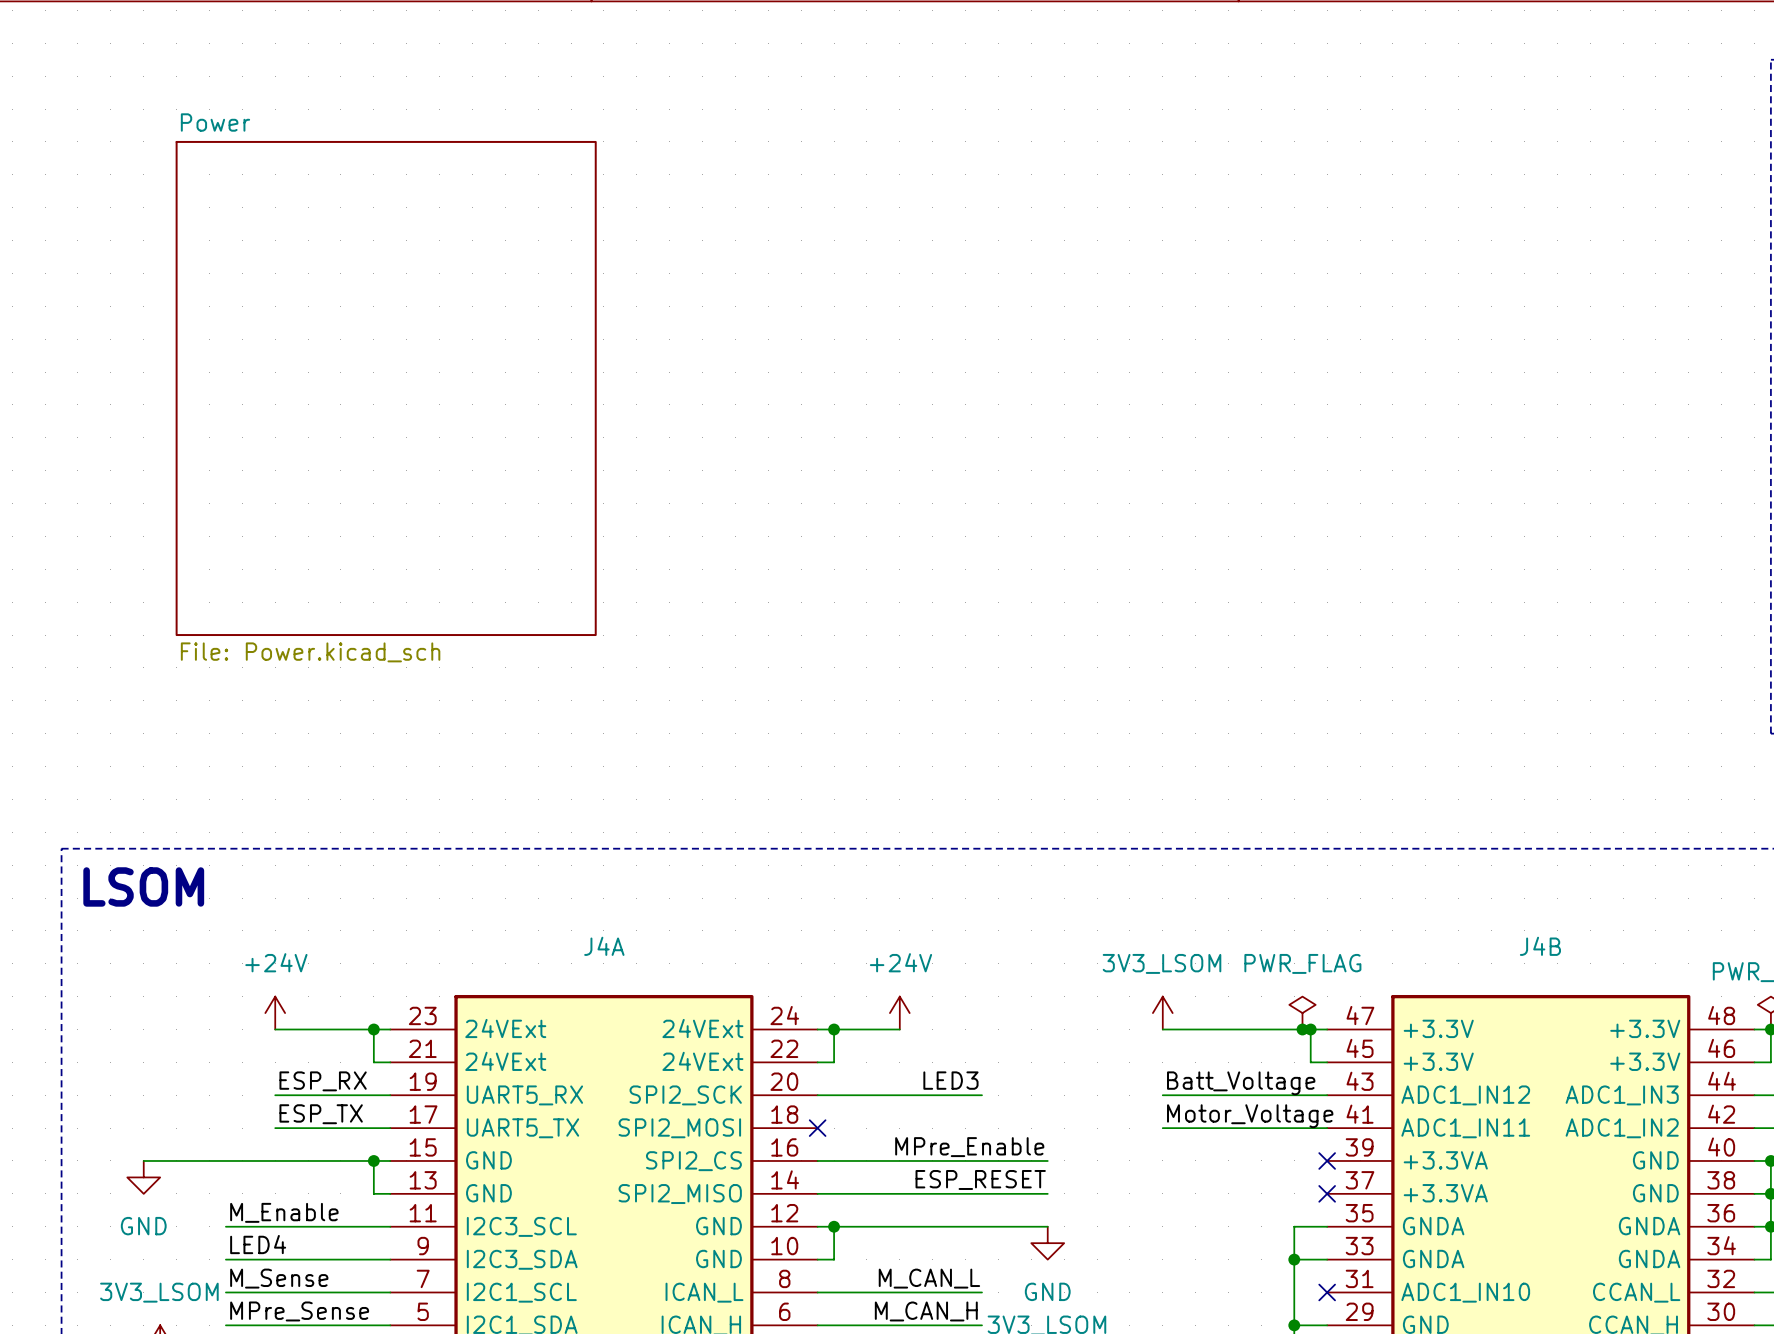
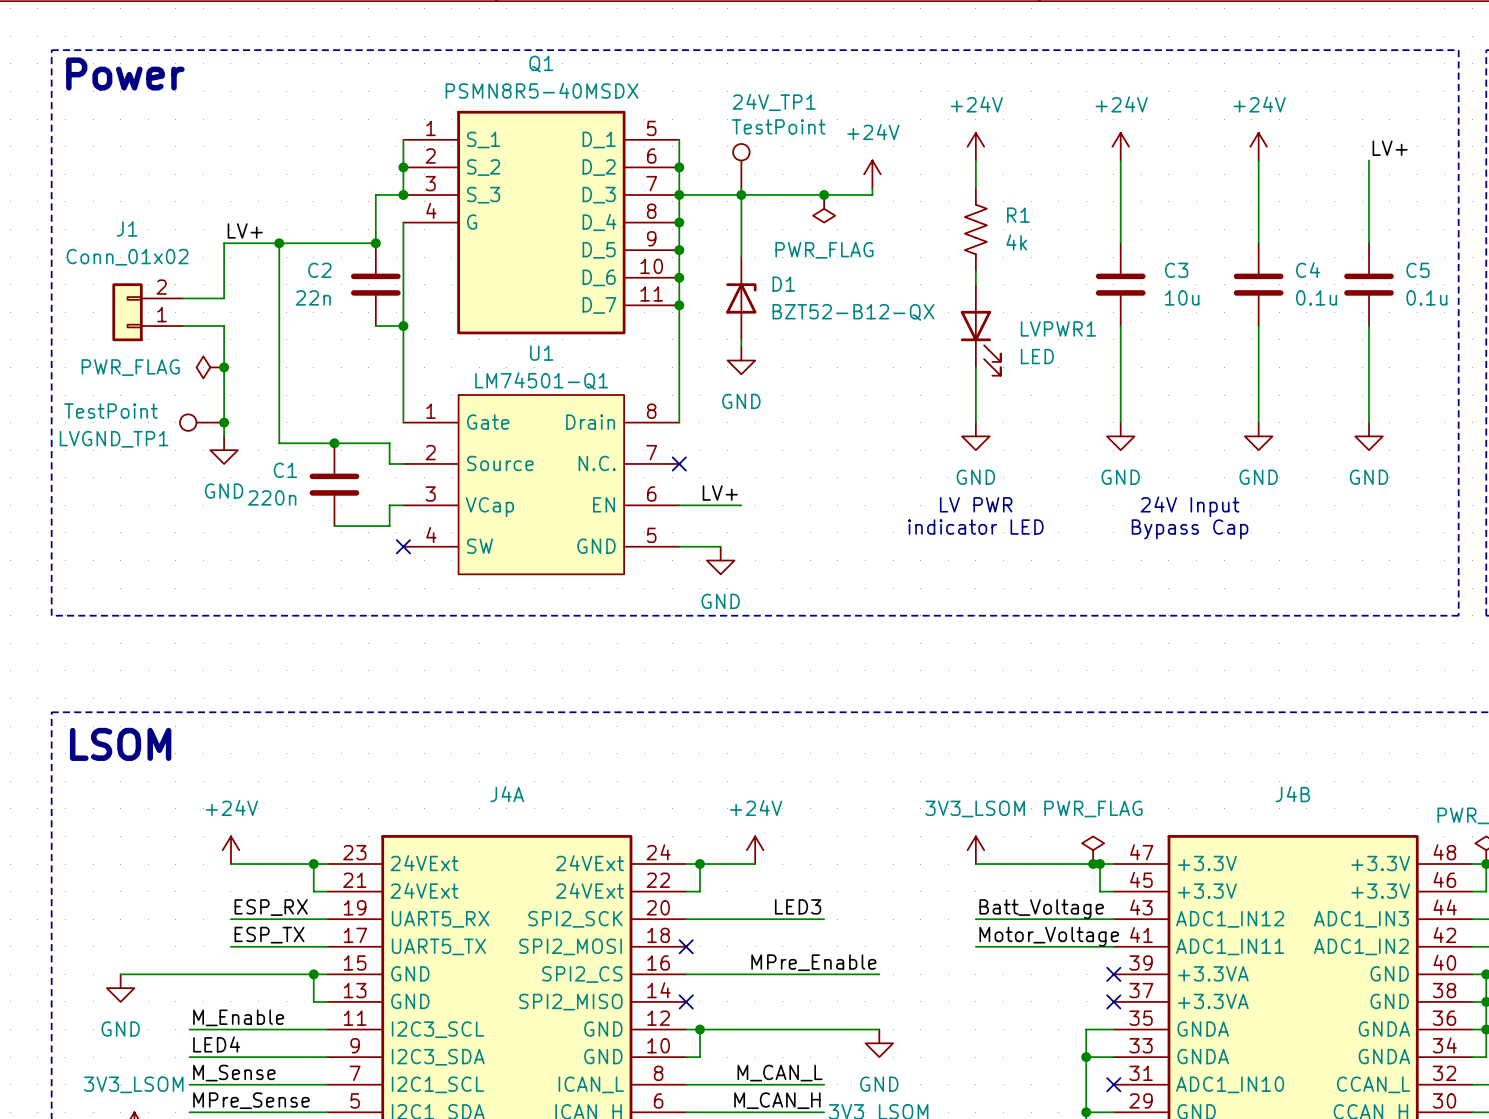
line: none -> (51, 50) (51, 615) (1458, 615) (1458, 50) (51, 50)
text: none -> Power (125, 73)
wire: none -> (403, 139) (403, 194) (375, 194) (375, 243) (224, 243) (224, 298) (182, 298)
wire: none -> (679, 139) (679, 422)
power symbol: none -> +24V (975, 146)
power symbol: none -> +24V (1120, 146)
power symbol: none -> +24V (1258, 146)
label: none -> LV+ (1390, 148)
wire: none -> (975, 160) (975, 188)
wire: none -> (1120, 160) (1120, 243)
wire: none -> (1258, 160) (1258, 243)
wire: none -> (1369, 160) (1369, 243)
24V_TP1: none -> TestPoint (741, 166)
junction: none -> (403, 167)
junction: none -> (679, 167)
power symbol: none -> +24V (872, 174)
wire: none -> (741, 188) (741, 257)
wire: none -> (872, 188) (872, 194) (679, 194)
junction: none -> (403, 194)
junction: none -> (679, 194)
junction: none -> (741, 194)
junction: none -> (824, 194)
power symbol: none -> PWR_FLAG (824, 208)
wire: none -> (403, 222) (403, 422)
Q1: none -> PSMN8R5-40MSDX (541, 222)
junction: none -> (679, 222)
R1: none -> 4k (975, 229)
label: none -> LV+ (245, 230)
wire: none -> (279, 243) (279, 443) (389, 443) (389, 463) (403, 463)
junction: none -> (279, 243)
junction: none -> (375, 243)
junction: none -> (679, 250)
wire: none -> (975, 270) (975, 284)
junction: none -> (679, 277)
C2: none -> 22n (375, 284)
C3: none -> 10u (1120, 284)
C4: none -> 0.1u (1258, 284)
C5: none -> 0.1u (1369, 284)
D1: none -> BZT52-B12-QX (741, 298)
junction: none -> (679, 305)
J1: none -> Conn_01x02 (147, 312)
wire: none -> (182, 326) (224, 326) (224, 436)
sheet Power: File: Power.kicad_sch (386, 388) -> none
wire: none -> (375, 326) (403, 326)
junction: none -> (403, 326)
wire: none -> (1120, 326) (1120, 422)
wire: none -> (1258, 326) (1258, 422)
wire: none -> (1369, 326) (1369, 422)
LVPWR1: none -> LED (980, 330)
wire: none -> (741, 339) (741, 346)
power symbol: none -> GND (741, 360)
power symbol: none -> PWR_FLAG (210, 367)
junction: none -> (224, 367)
wire: none -> (975, 367) (975, 422)
LVGND_TP1: none -> TestPoint (202, 422)
junction: none -> (224, 422)
power symbol: none -> GND (975, 436)
power symbol: none -> GND (1120, 436)
power symbol: none -> GND (1258, 436)
power symbol: none -> GND (1369, 436)
junction: none -> (334, 443)
power symbol: none -> GND (224, 450)
no-connect mark: none -> (679, 463)
C1: none -> 220n (334, 484)
U1: none -> LM74501-Q1 (541, 484)
label: none -> LV+ (720, 493)
text: none -> LV PWR (976, 504)
wire: none -> (403, 505) (389, 505) (389, 526) (334, 526)
wire: none -> (679, 505) (741, 505)
text: none -> 24V Input (1190, 506)
text: none -> indicator LED (975, 527)
text: none -> Bypass Cap (1190, 529)
no-connect mark: none -> (403, 546)
wire: none -> (679, 546) (720, 546)
power symbol: none -> GND (720, 560)
label: ESP_RESET (980, 1179) -> none
wire: (817, 1193) (1047, 1193) -> none
no-connect mark: none -> (686, 1001)

